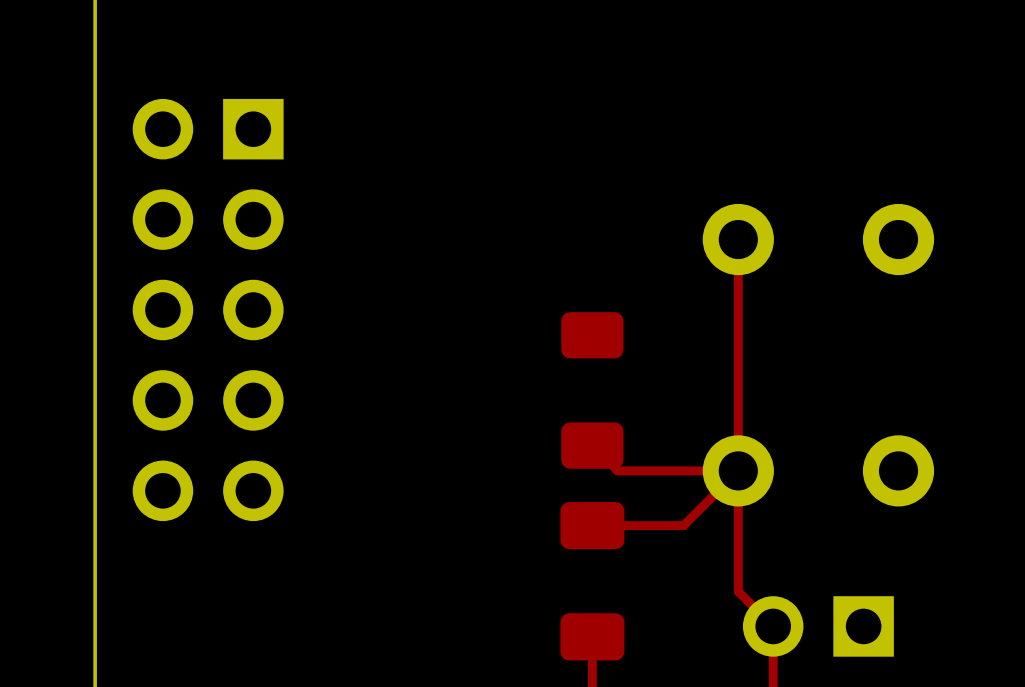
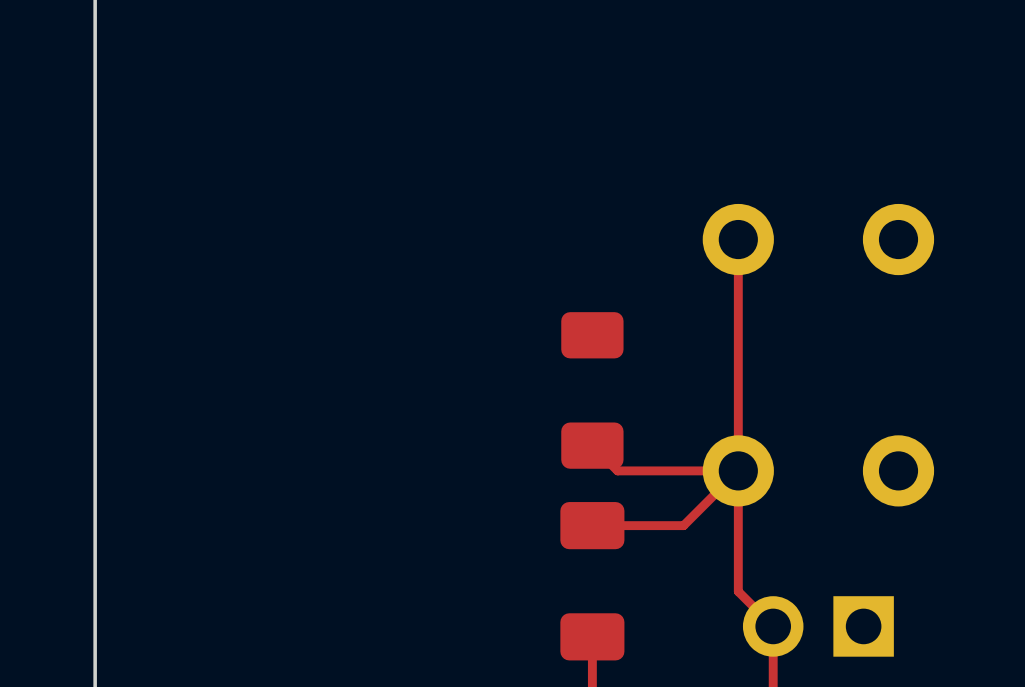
part: (208, 310) -> none

